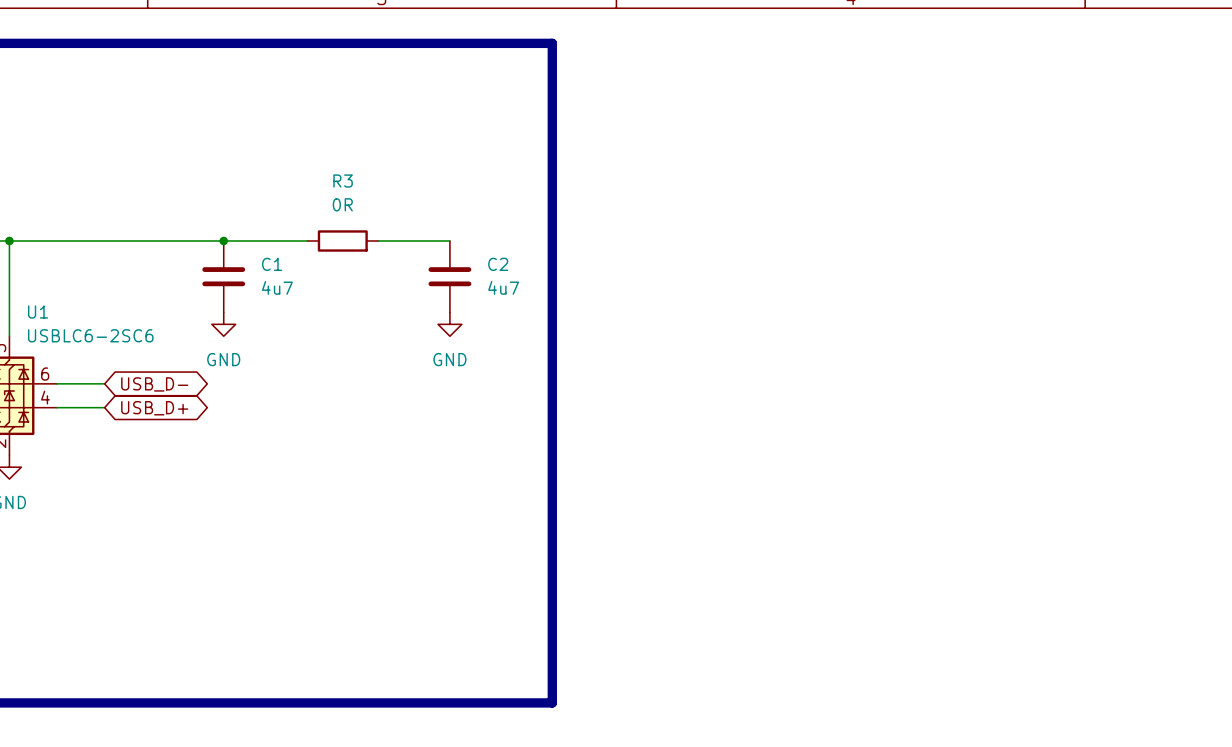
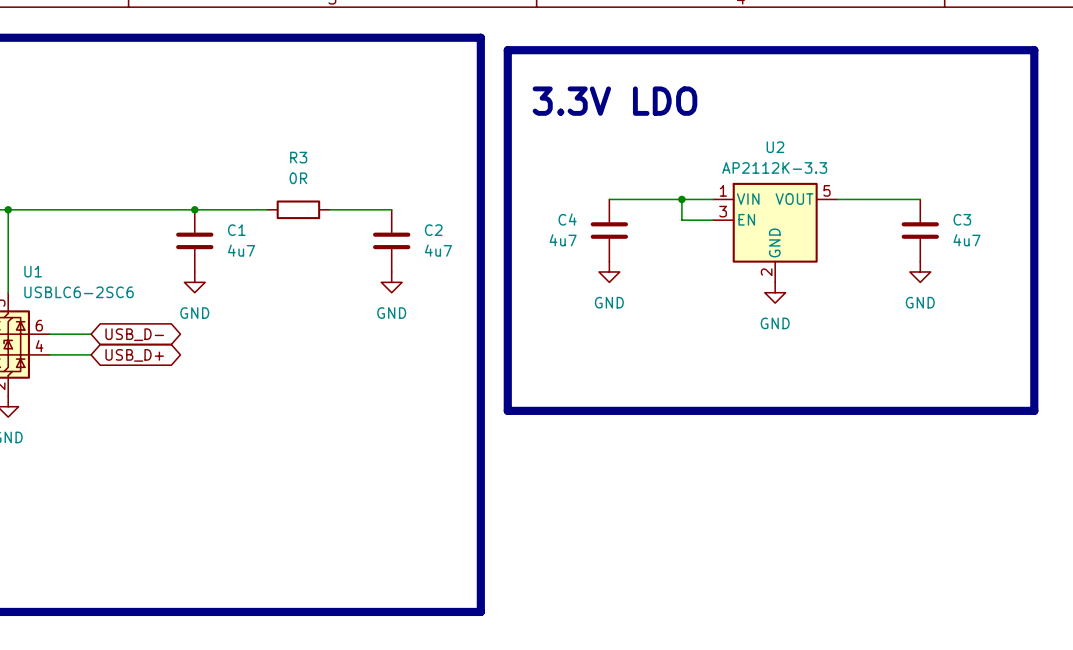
line: none -> (507, 50) (1034, 50) (1034, 410) (507, 410) (507, 50)
text: none -> 3.3V LDO (614, 101)
wire: none -> (609, 199) (713, 199)
wire: none -> (681, 199) (681, 220) (713, 220)
junction: none -> (681, 199)
wire: none -> (837, 199) (920, 199)
C4: none -> 4u7 (609, 230)
C3: none -> 4u7 (920, 230)
U2: none -> AP2112K-3.3 (775, 232)
power symbol: none -> GND (609, 271)
power symbol: none -> GND (920, 271)
power symbol: none -> GND (775, 292)

